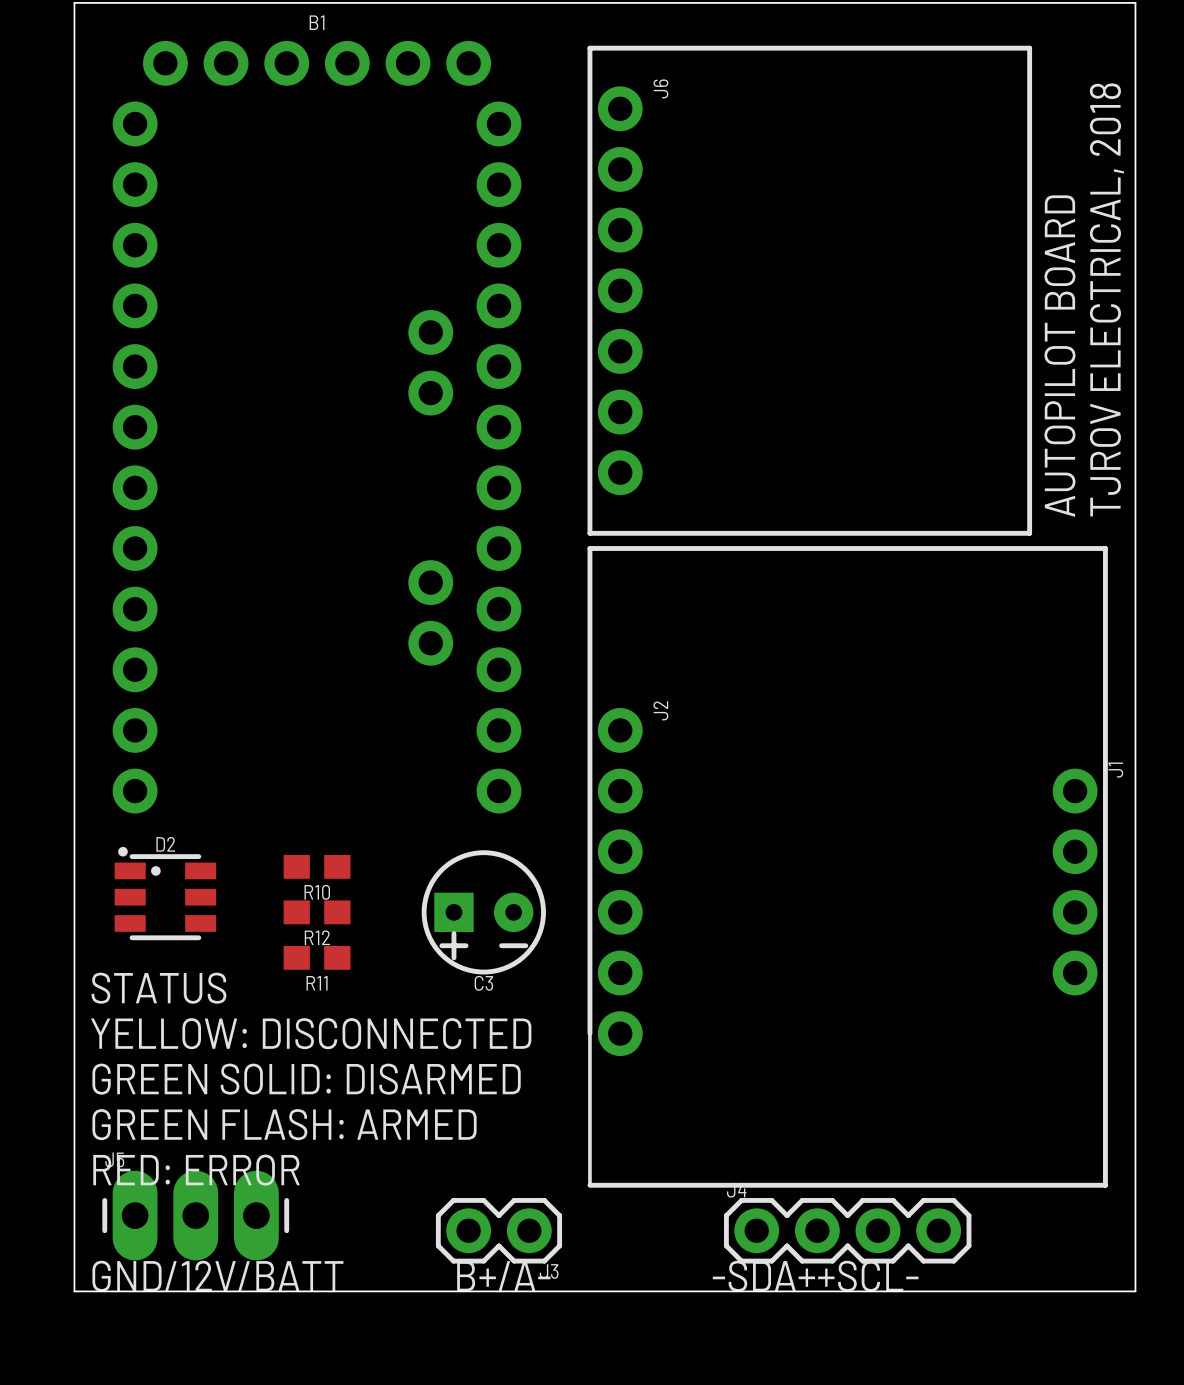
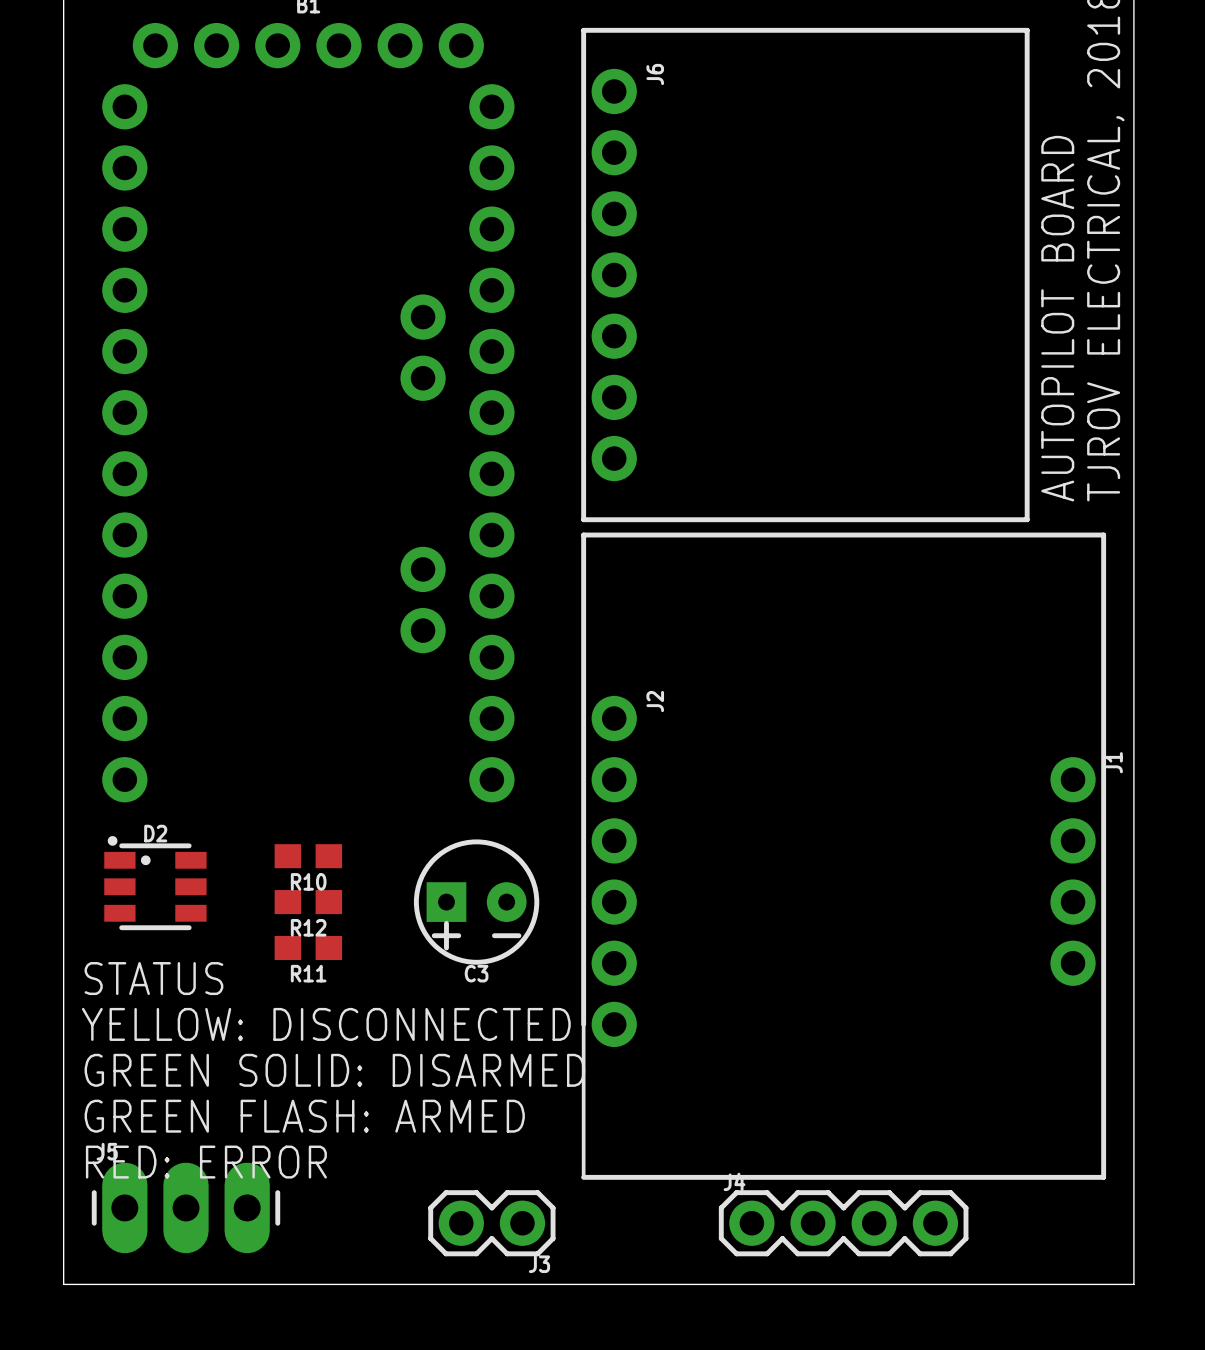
text: GND/12V/BATT (217, 1276) -> none
text: B+/A- (503, 1276) -> none
text: -SDA++SCL- (815, 1276) -> none

